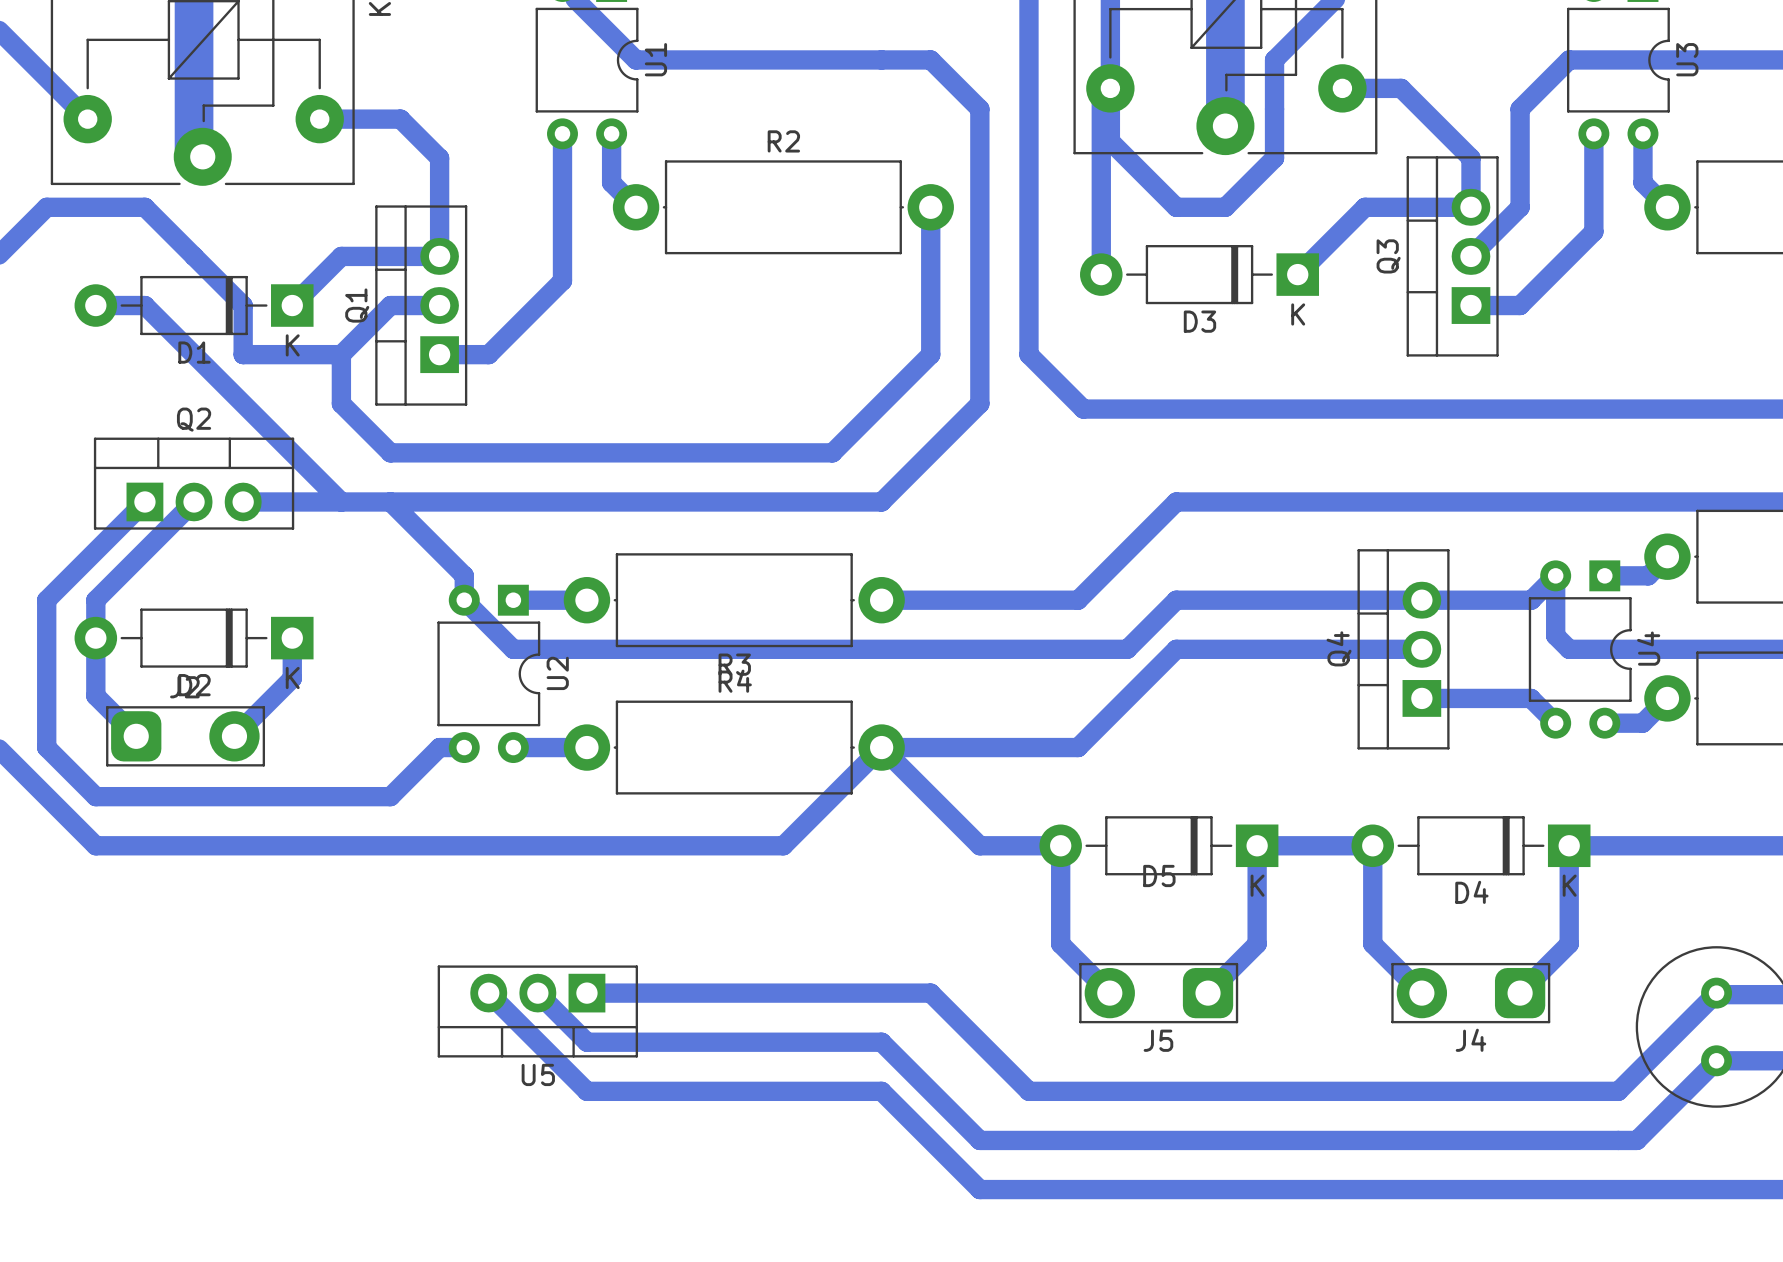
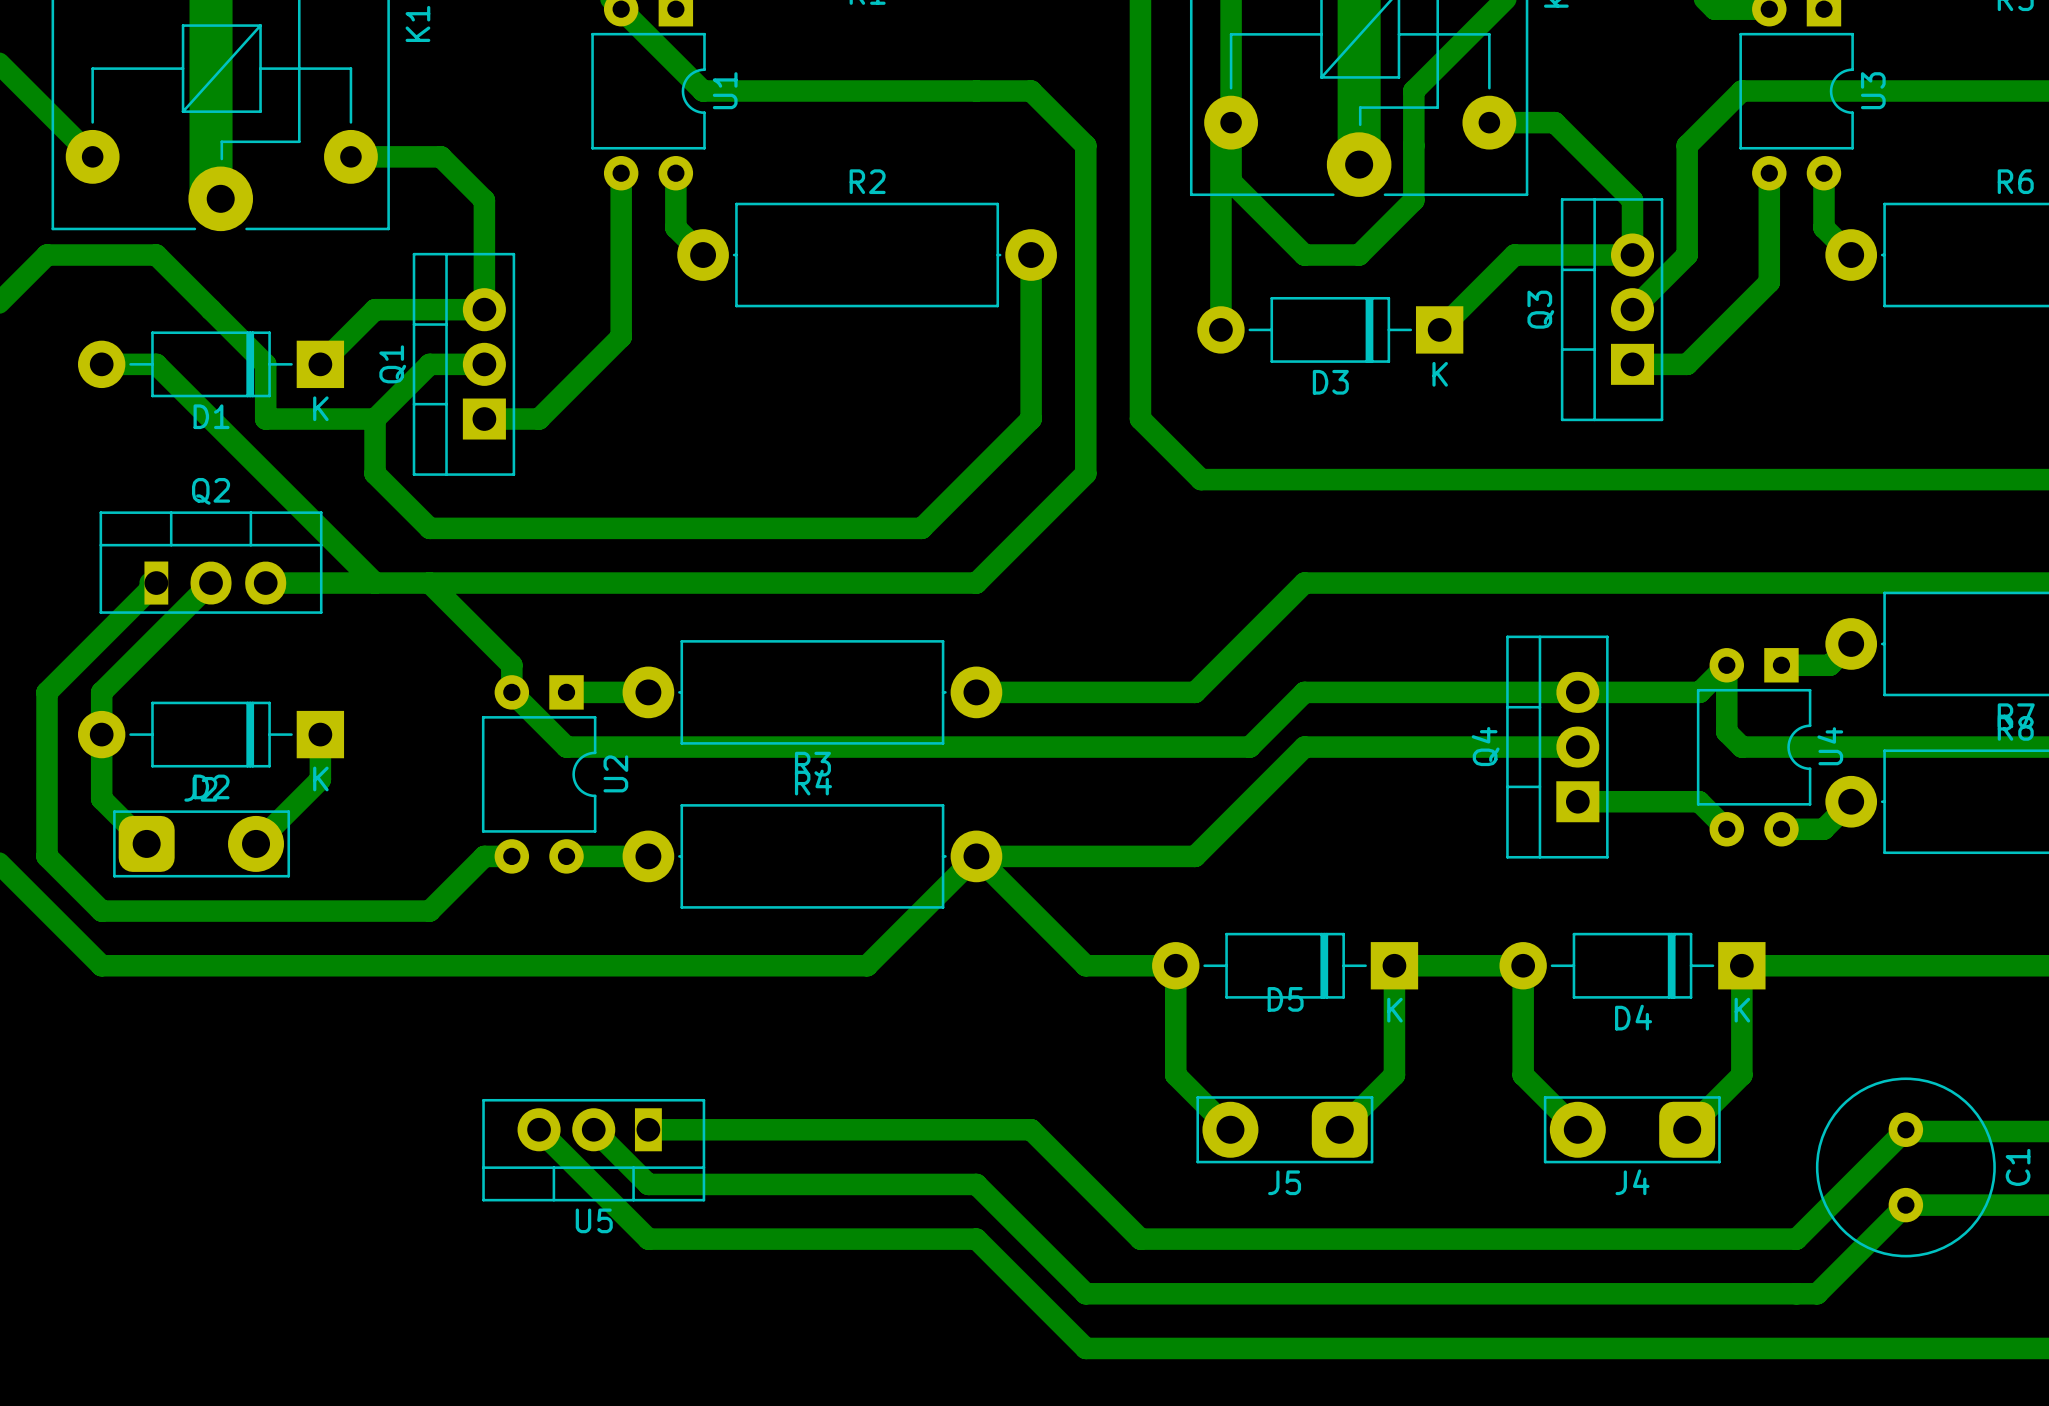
Q3 footprint: [1406, 156, 1499, 357] -> [1560, 198, 1664, 422]
Q1 footprint: [375, 205, 468, 406] -> [412, 252, 516, 476]
Q2 footprint: [93, 437, 295, 530] -> [99, 511, 323, 614]
U5 footprint: [437, 965, 639, 1058] -> [482, 1098, 706, 1202]

